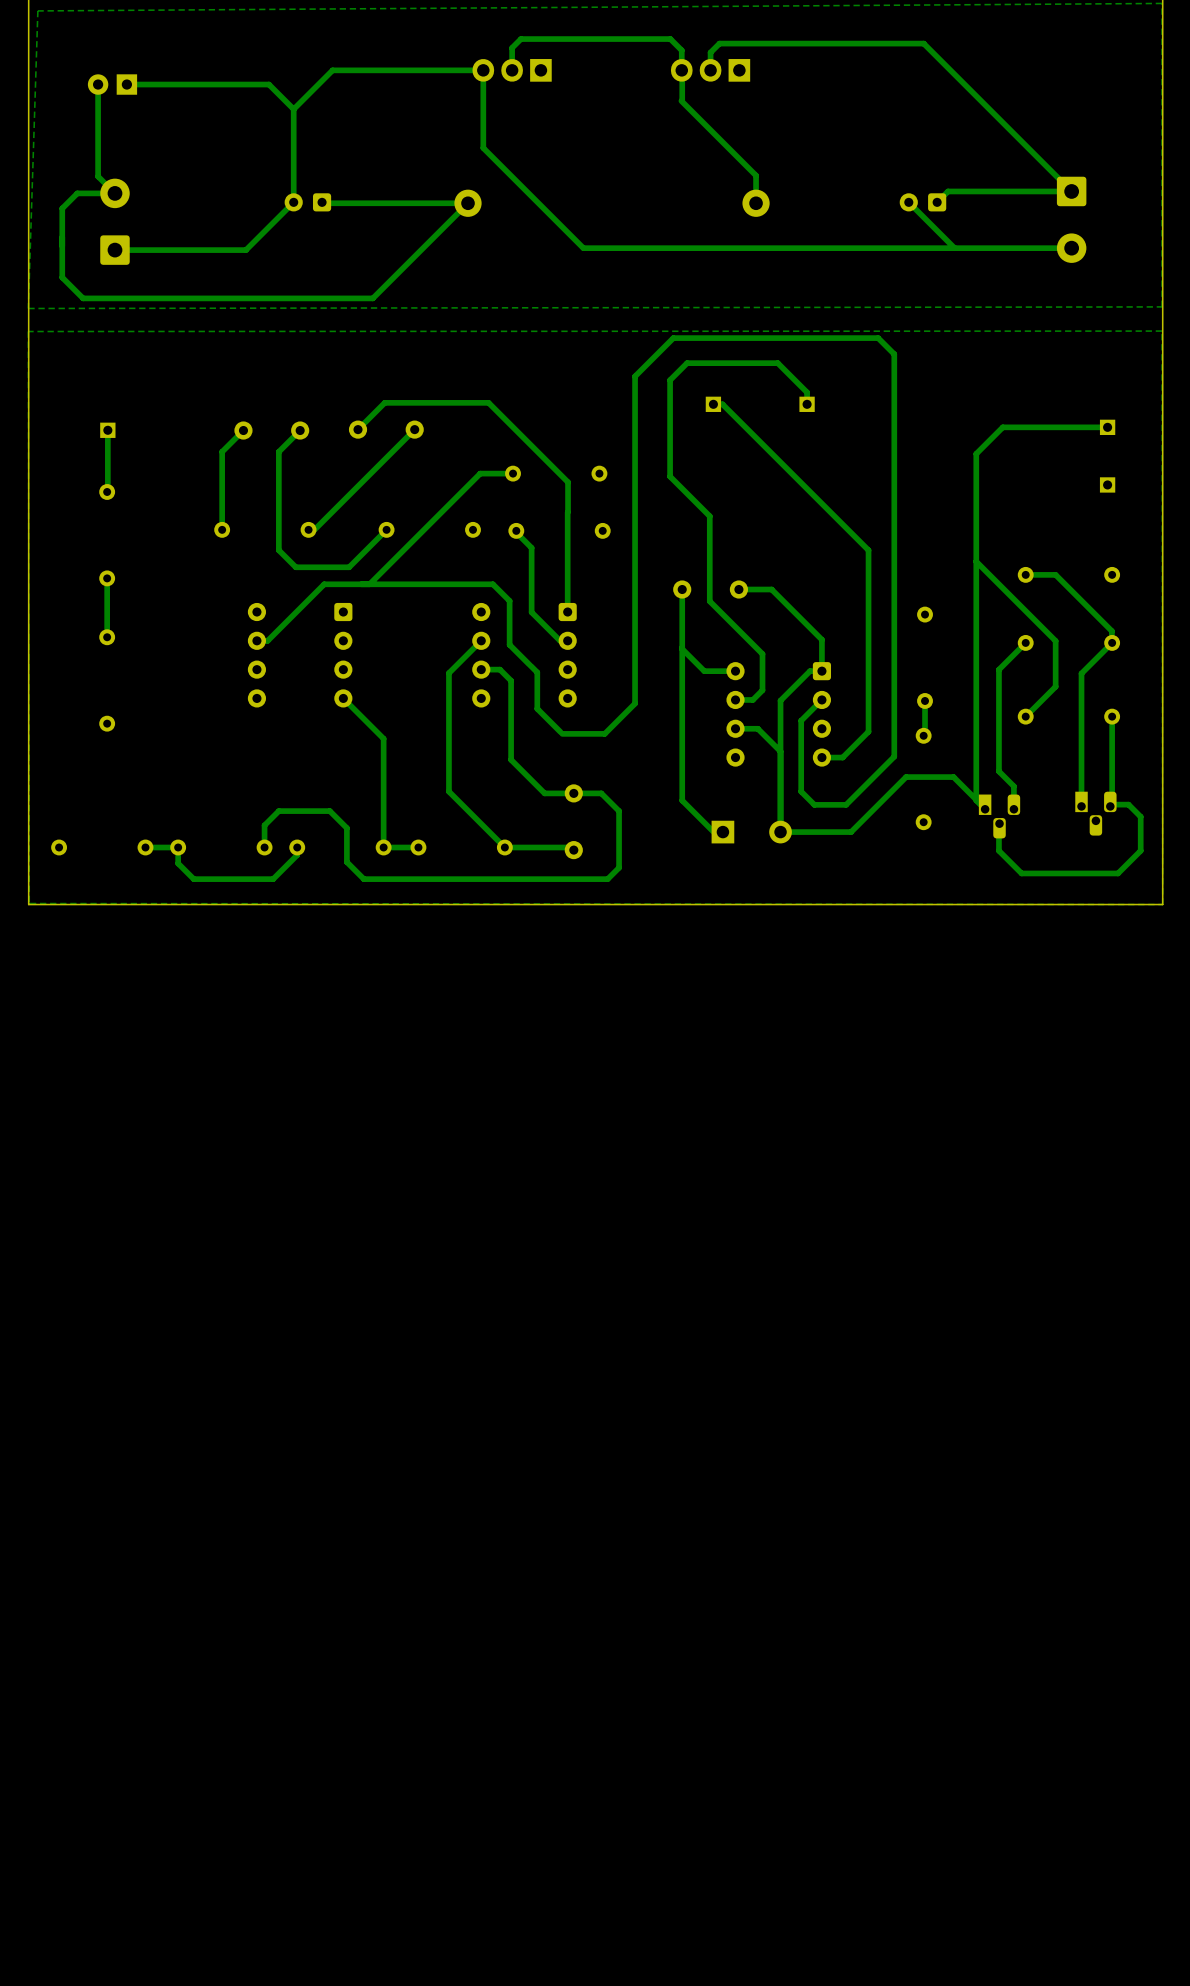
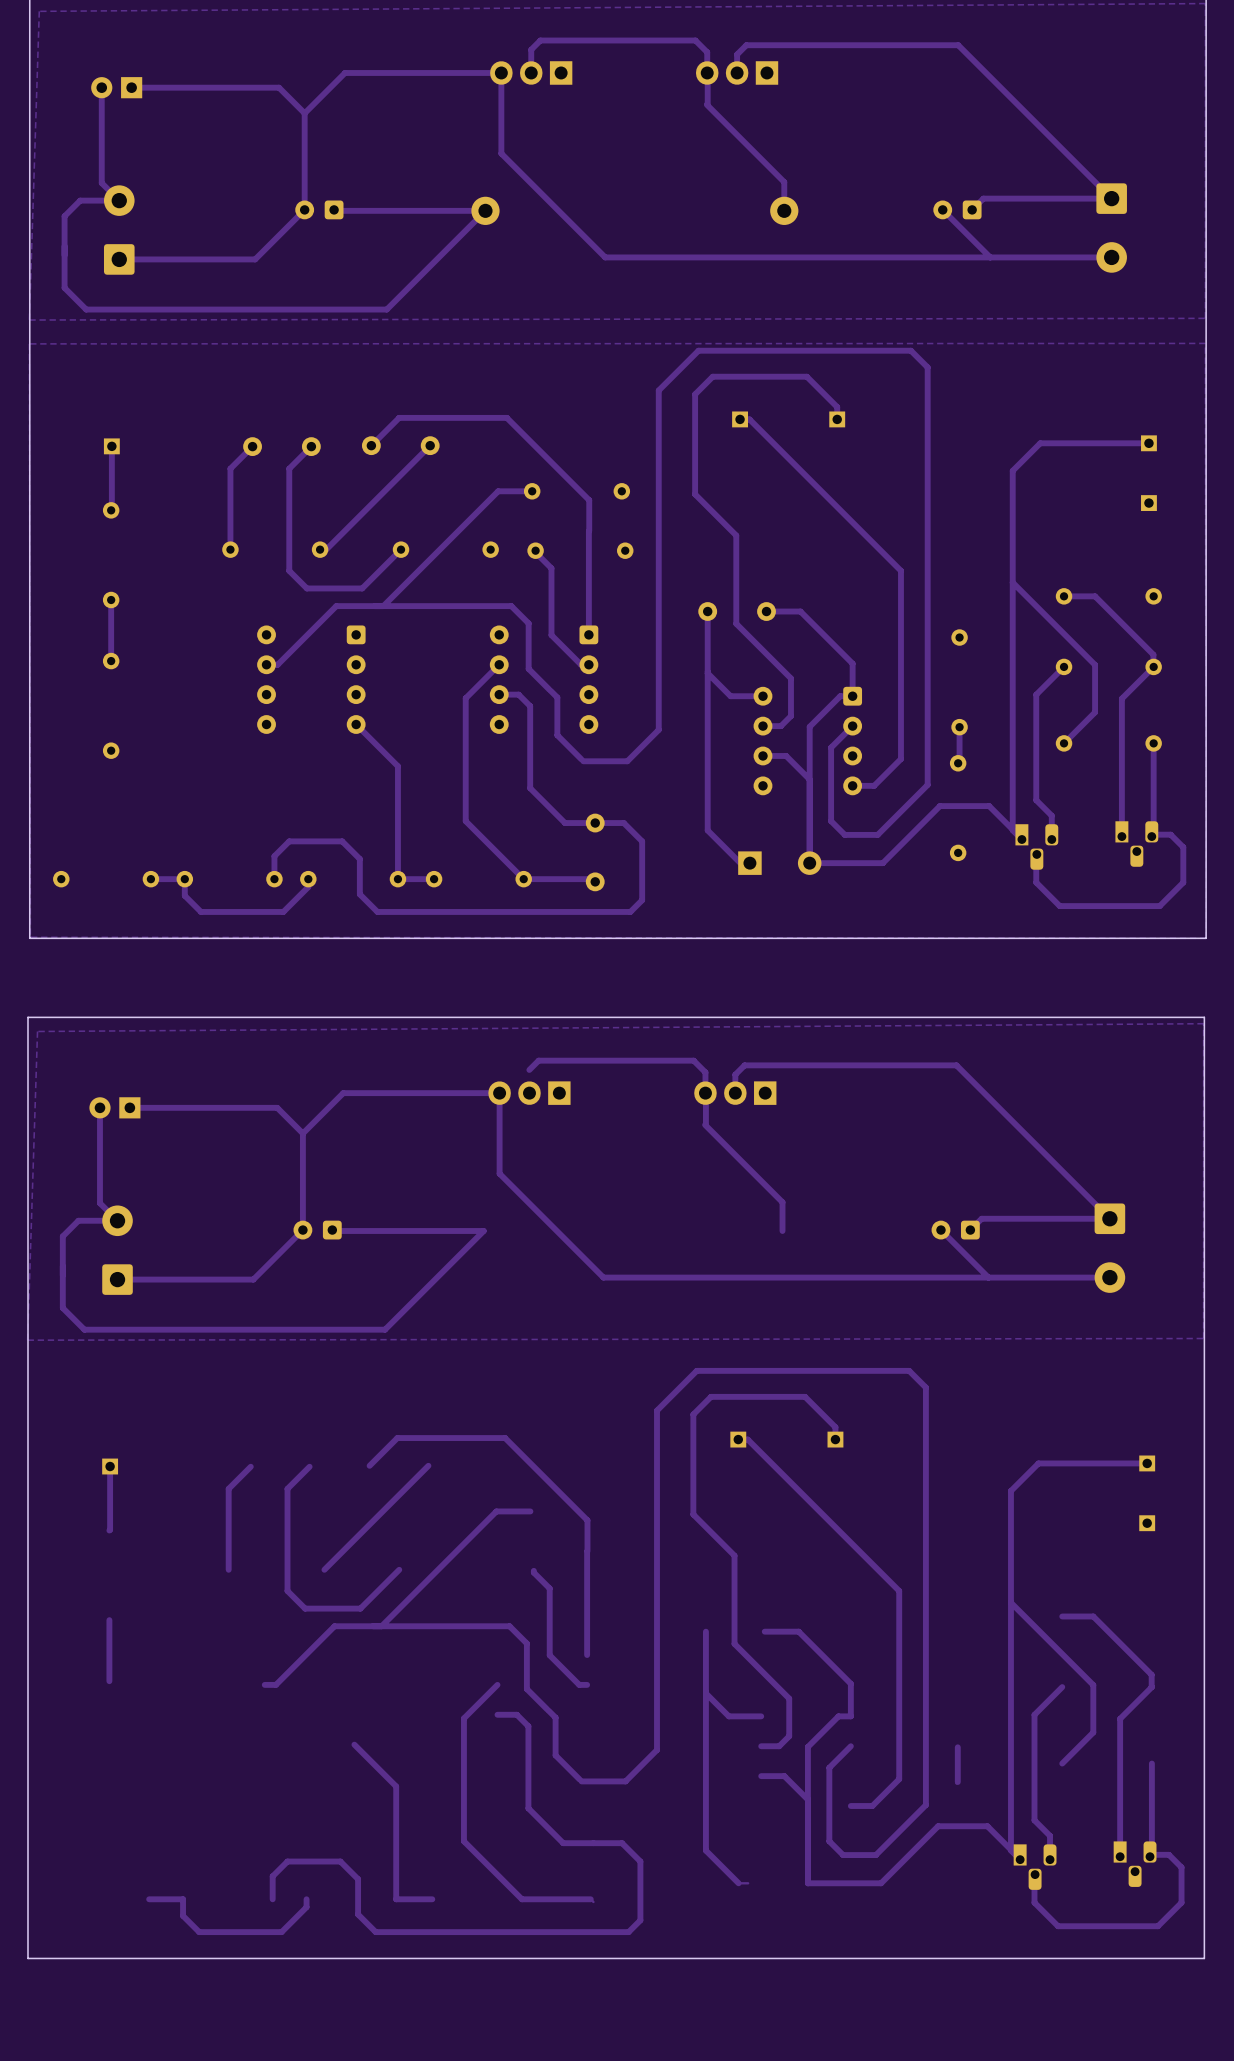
board edge: none -> (1204, 1017) (27, 1017) (27, 1958) (1204, 1958) (1204, 1017)
zone outline: none -> (1203, 1023) (1203, 1338) (27, 1340) (37, 1031) (1203, 1023)
track: none -> (529, 1069) (538, 1060) (693, 1060) (705, 1072) (705, 1093)
track: none -> (705, 1088) (705, 1124) (782, 1202) (782, 1231)
track: none -> (499, 1093) (343, 1093) (302, 1133)
track: none -> (499, 1093) (499, 1173) (603, 1277) (1109, 1277)
part: none -> (529, 1093)
track: none -> (735, 1093) (735, 1074) (744, 1065) (956, 1065) (1109, 1218) (981, 1218) (970, 1230)
part: none -> (735, 1093)
track: none -> (99, 1107) (99, 1203) (117, 1220) (78, 1220) (62, 1236) (62, 1308) (84, 1329) (385, 1329) (483, 1231) (332, 1230)
part: none -> (114, 1107)
track: none -> (129, 1107) (277, 1107) (302, 1133)
track: none -> (302, 1133) (302, 1230) (253, 1279) (117, 1279)
part: none -> (317, 1230)
track: none -> (940, 1230) (988, 1277)
part: none -> (955, 1230)
part: none -> (1109, 1248)
part: none -> (117, 1250)
track: none -> (738, 1439) (747, 1439) (899, 1590) (899, 1779) (872, 1806) (850, 1806)
part: none -> (738, 1439)
track: none -> (835, 1439) (835, 1427) (805, 1396) (710, 1396) (693, 1414) (693, 1514) (734, 1555) (734, 1643) (789, 1698) (789, 1736) (779, 1746) (761, 1746)
part: none -> (835, 1439)
track: none -> (1147, 1463) (1038, 1463) (1010, 1490) (1010, 1850) (1020, 1859) (1020, 1858) (987, 1826) (938, 1826) (881, 1883) (807, 1883) (807, 1746) (838, 1716) (850, 1716) (850, 1683) (798, 1631) (764, 1631)
part: none -> (1147, 1463)
track: none -> (110, 1466) (109, 1530)
part: none -> (110, 1466)
track: none -> (250, 1466) (228, 1488) (228, 1569)
track: none -> (309, 1466) (287, 1488) (287, 1590) (305, 1608) (360, 1608) (399, 1569)
track: none -> (369, 1465) (397, 1438) (505, 1438) (587, 1520) (587, 1655)
track: none -> (428, 1465) (324, 1569)
track: none -> (530, 1511) (496, 1511) (381, 1626)
part: none -> (1147, 1523)
track: none -> (533, 1570) (549, 1588) (549, 1655) (579, 1684) (587, 1684)
track: none -> (1010, 1602) (1093, 1685) (1093, 1732) (1062, 1763)
track: none -> (1062, 1616) (1093, 1616) (1151, 1674) (1151, 1687) (1120, 1718) (1120, 1856)
track: none -> (109, 1620) (109, 1681)
track: none -> (705, 1631) (705, 1850) (738, 1883) (748, 1883)
track: none -> (264, 1684) (275, 1684) (334, 1626) (509, 1626) (526, 1643) (526, 1689) (547, 1709)
track: none -> (497, 1684) (463, 1718) (463, 1841) (521, 1899) (590, 1899) (593, 1902)
track: none -> (1062, 1687) (1034, 1714) (1034, 1820) (1050, 1835) (1050, 1859)
track: none -> (705, 1693) (728, 1716) (761, 1716)
track: none -> (547, 1710) (555, 1717) (555, 1755) (581, 1781) (625, 1781) (657, 1750) (657, 1410) (696, 1370) (909, 1370) (925, 1387) (925, 1805) (875, 1855) (843, 1855) (829, 1841) (829, 1767) (850, 1746)
track: none -> (497, 1714) (516, 1714) (528, 1726) (528, 1808) (563, 1843) (622, 1843) (640, 1861) (640, 1920) (628, 1932) (375, 1932) (358, 1914) (358, 1879) (340, 1861) (287, 1861) (272, 1876) (272, 1899)
track: none -> (354, 1744) (396, 1786) (396, 1899) (432, 1899)
track: none -> (957, 1747) (956, 1783)
track: none -> (1151, 1763) (1151, 1854)
track: none -> (761, 1776) (784, 1776) (807, 1799)
track: none -> (1151, 1854) (1168, 1854) (1181, 1867) (1181, 1902) (1158, 1926) (1058, 1926) (1034, 1902) (1035, 1874)
part: none -> (1135, 1864)
part: none -> (1035, 1867)
track: none -> (306, 1899) (306, 1907) (281, 1932) (199, 1932) (183, 1915) (183, 1899) (149, 1899)

